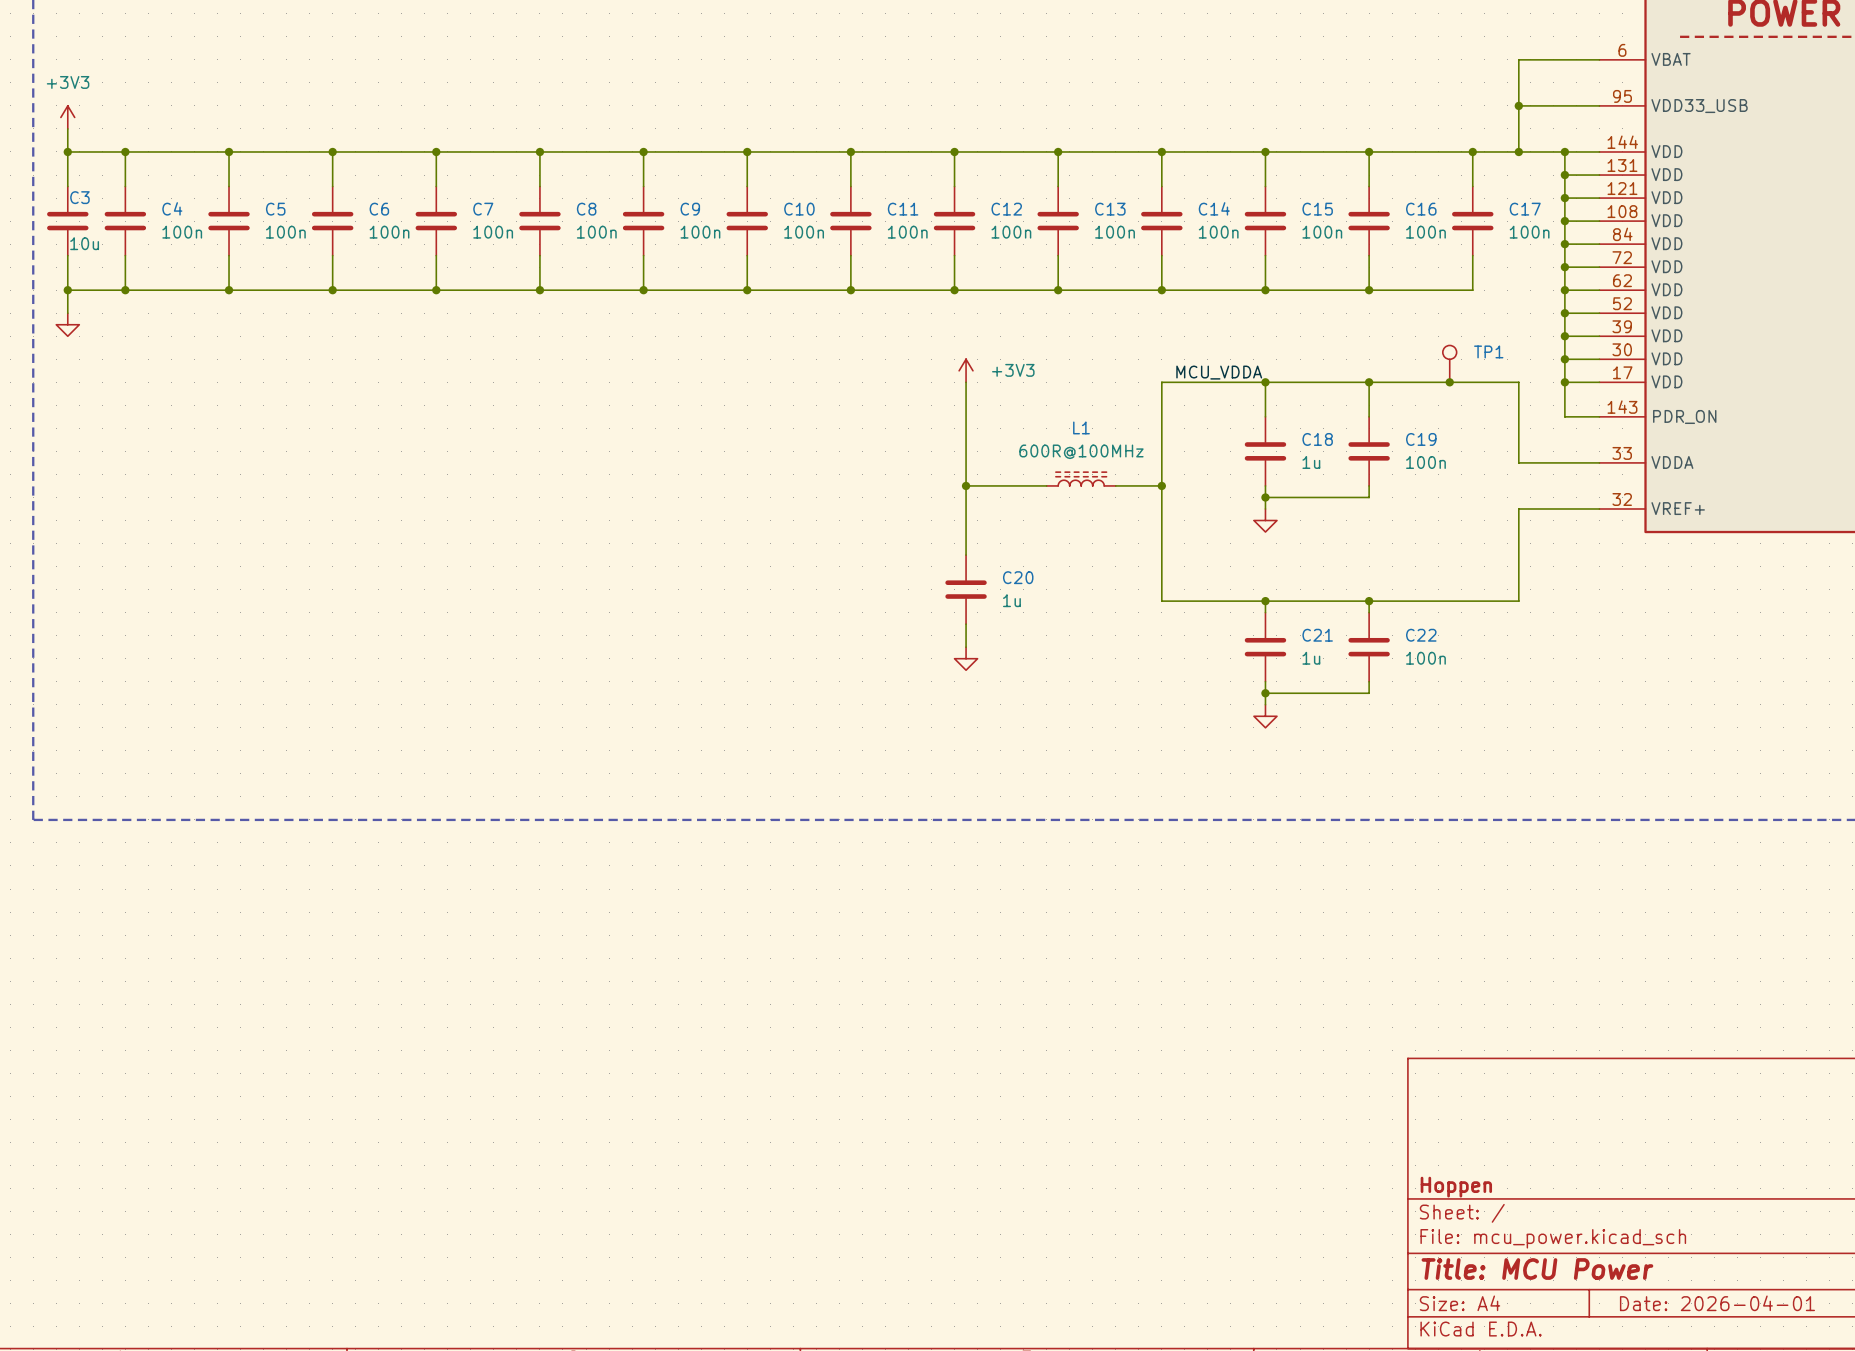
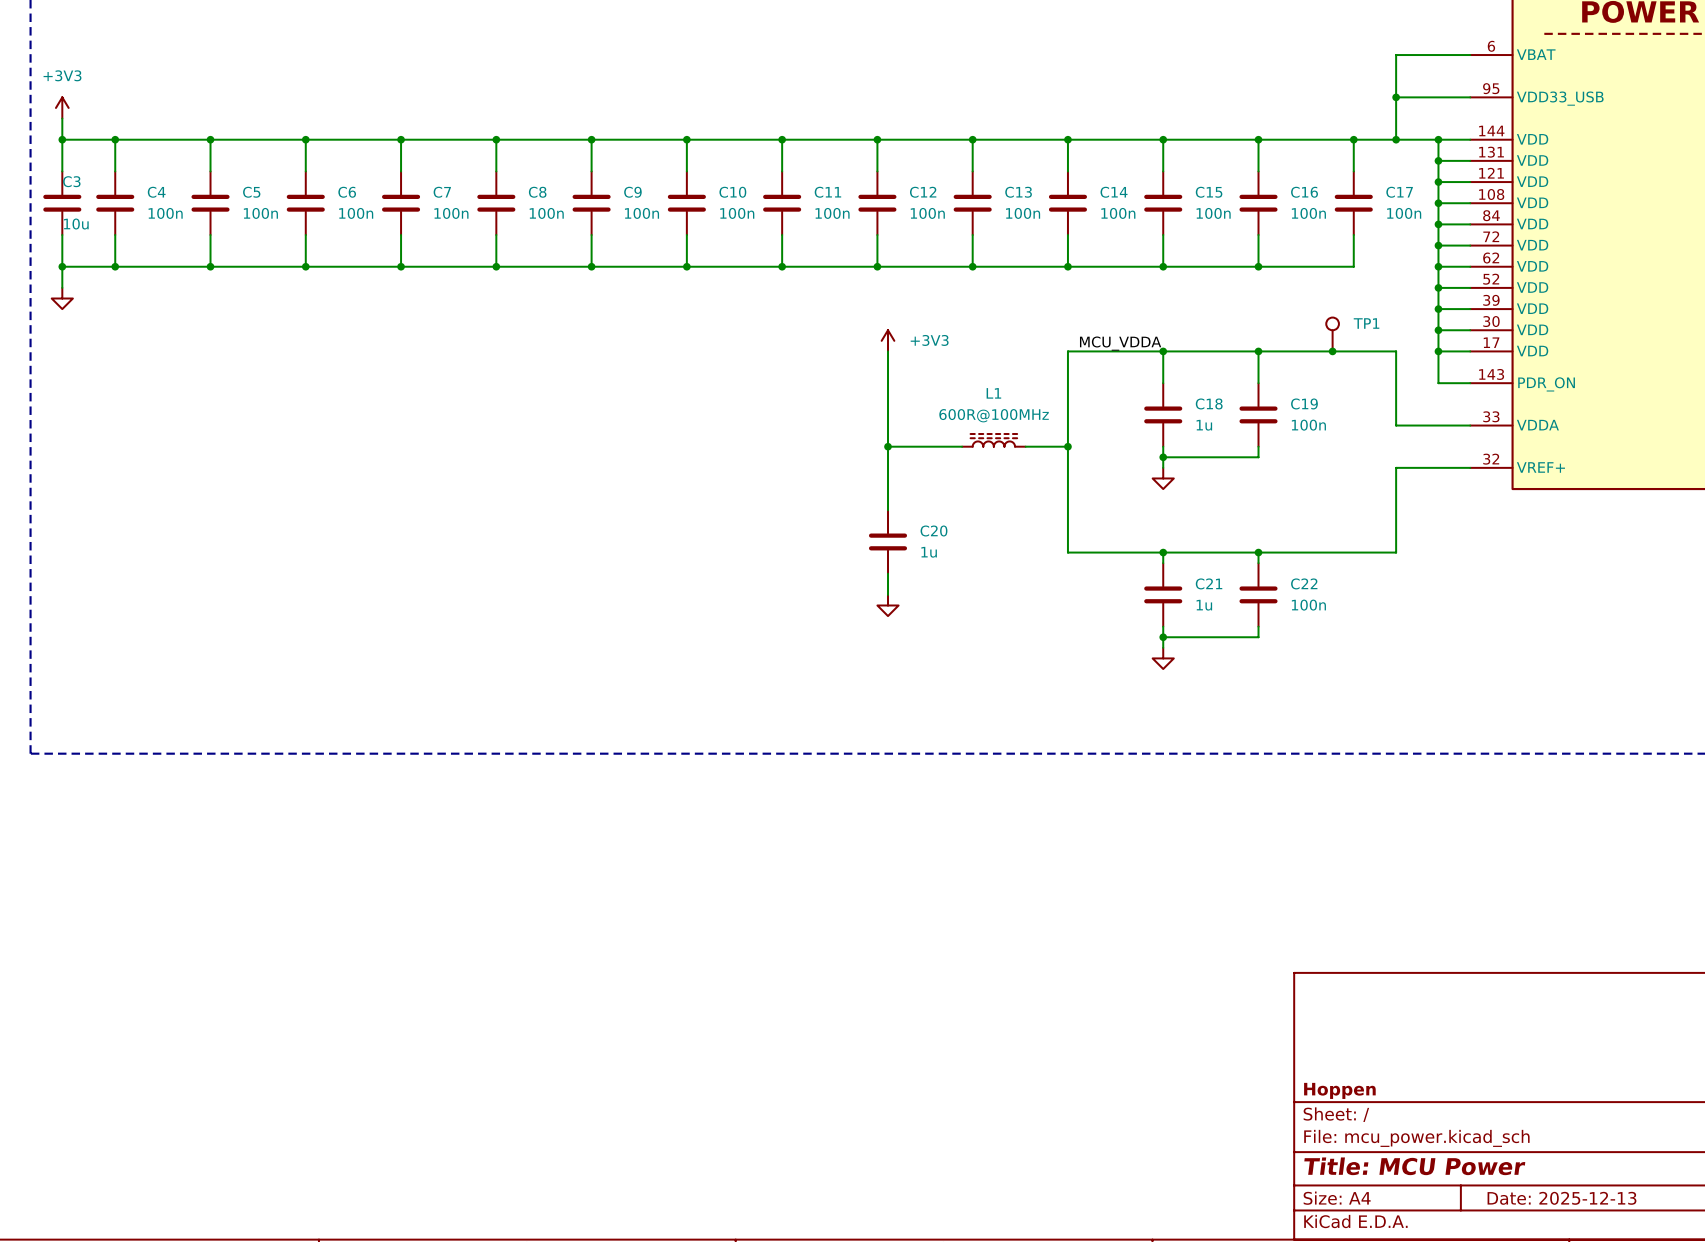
title block: Date: 2026-04-01 (1717, 1303) -> Date: 2025-12-13 (1561, 1198)

